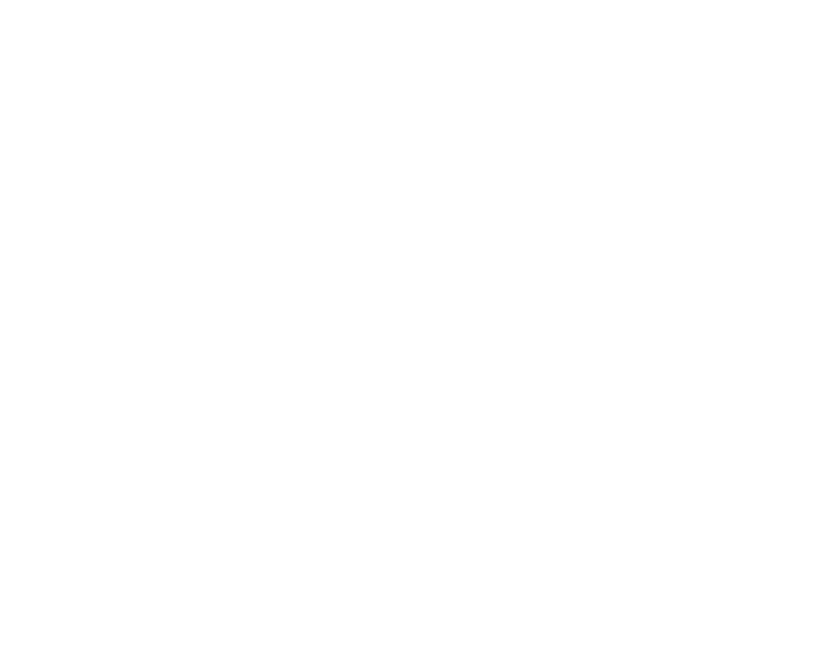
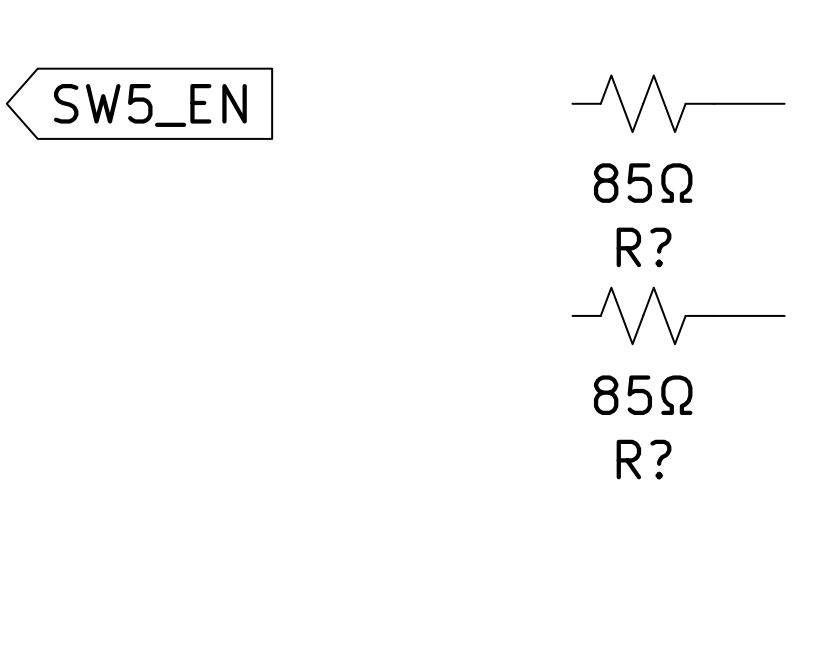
R?: none -> (643, 103)
wire: none -> (713, 103) (784, 103)
global label: none -> SW5_EN (150, 105)
R?: none -> (643, 315)
wire: none -> (713, 315) (784, 315)

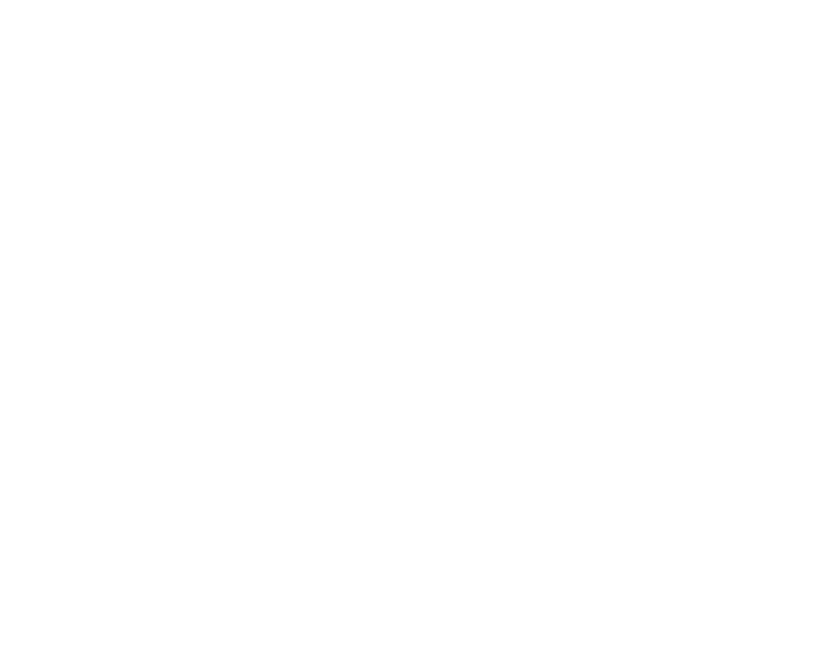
R?: (643, 103) -> none
wire: (713, 103) (784, 103) -> none
global label: SW5_EN (150, 105) -> none
R?: (643, 315) -> none
wire: (713, 315) (784, 315) -> none

